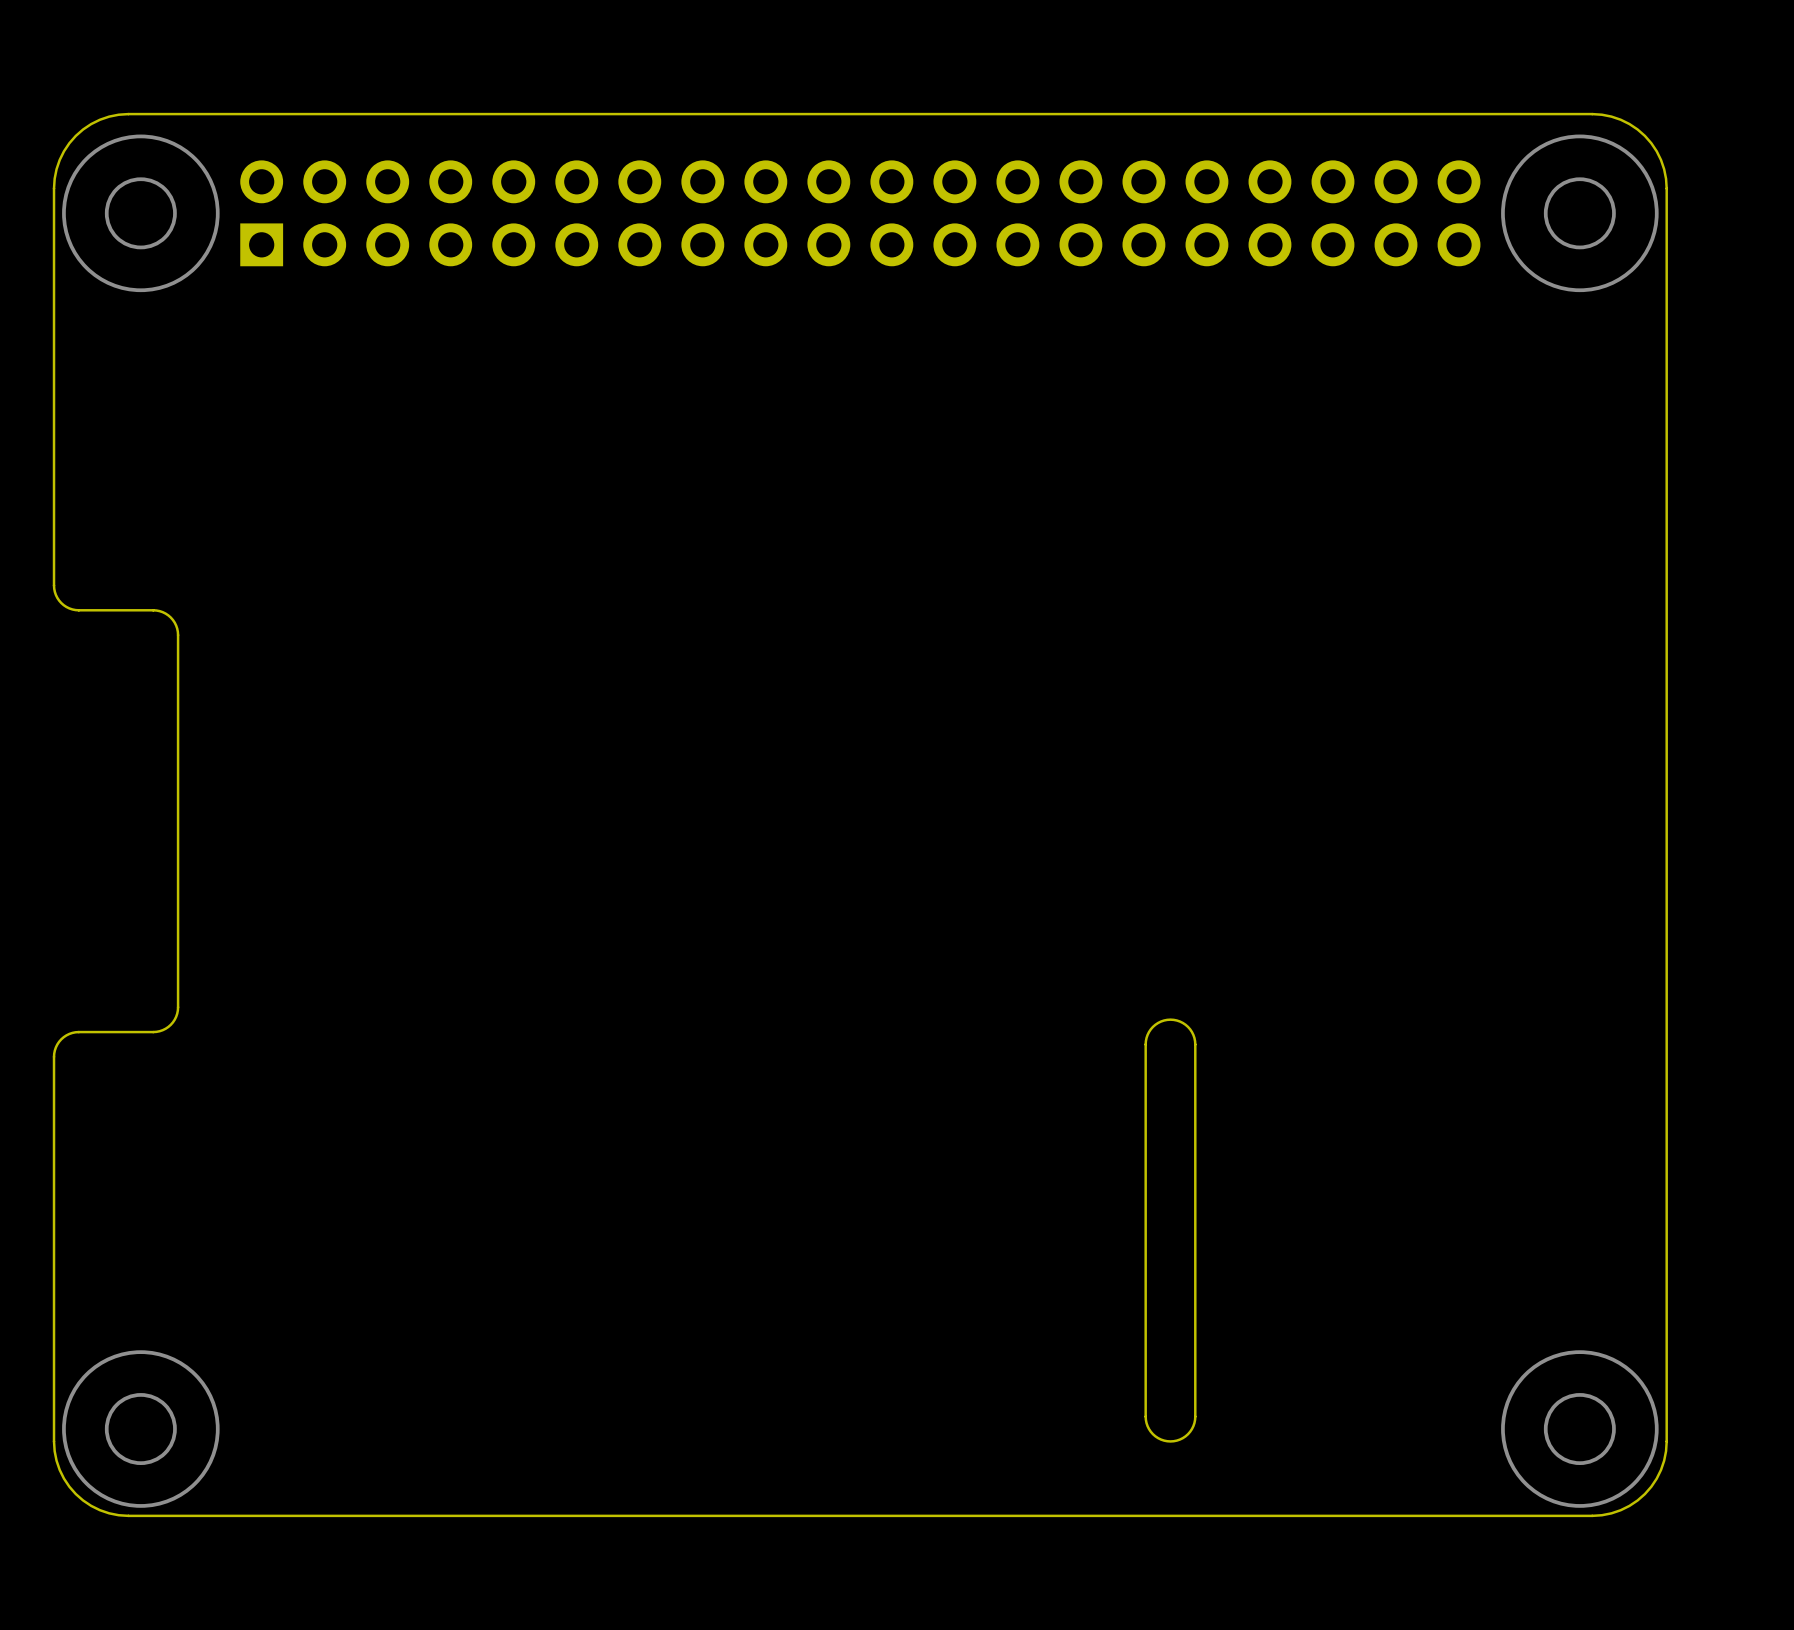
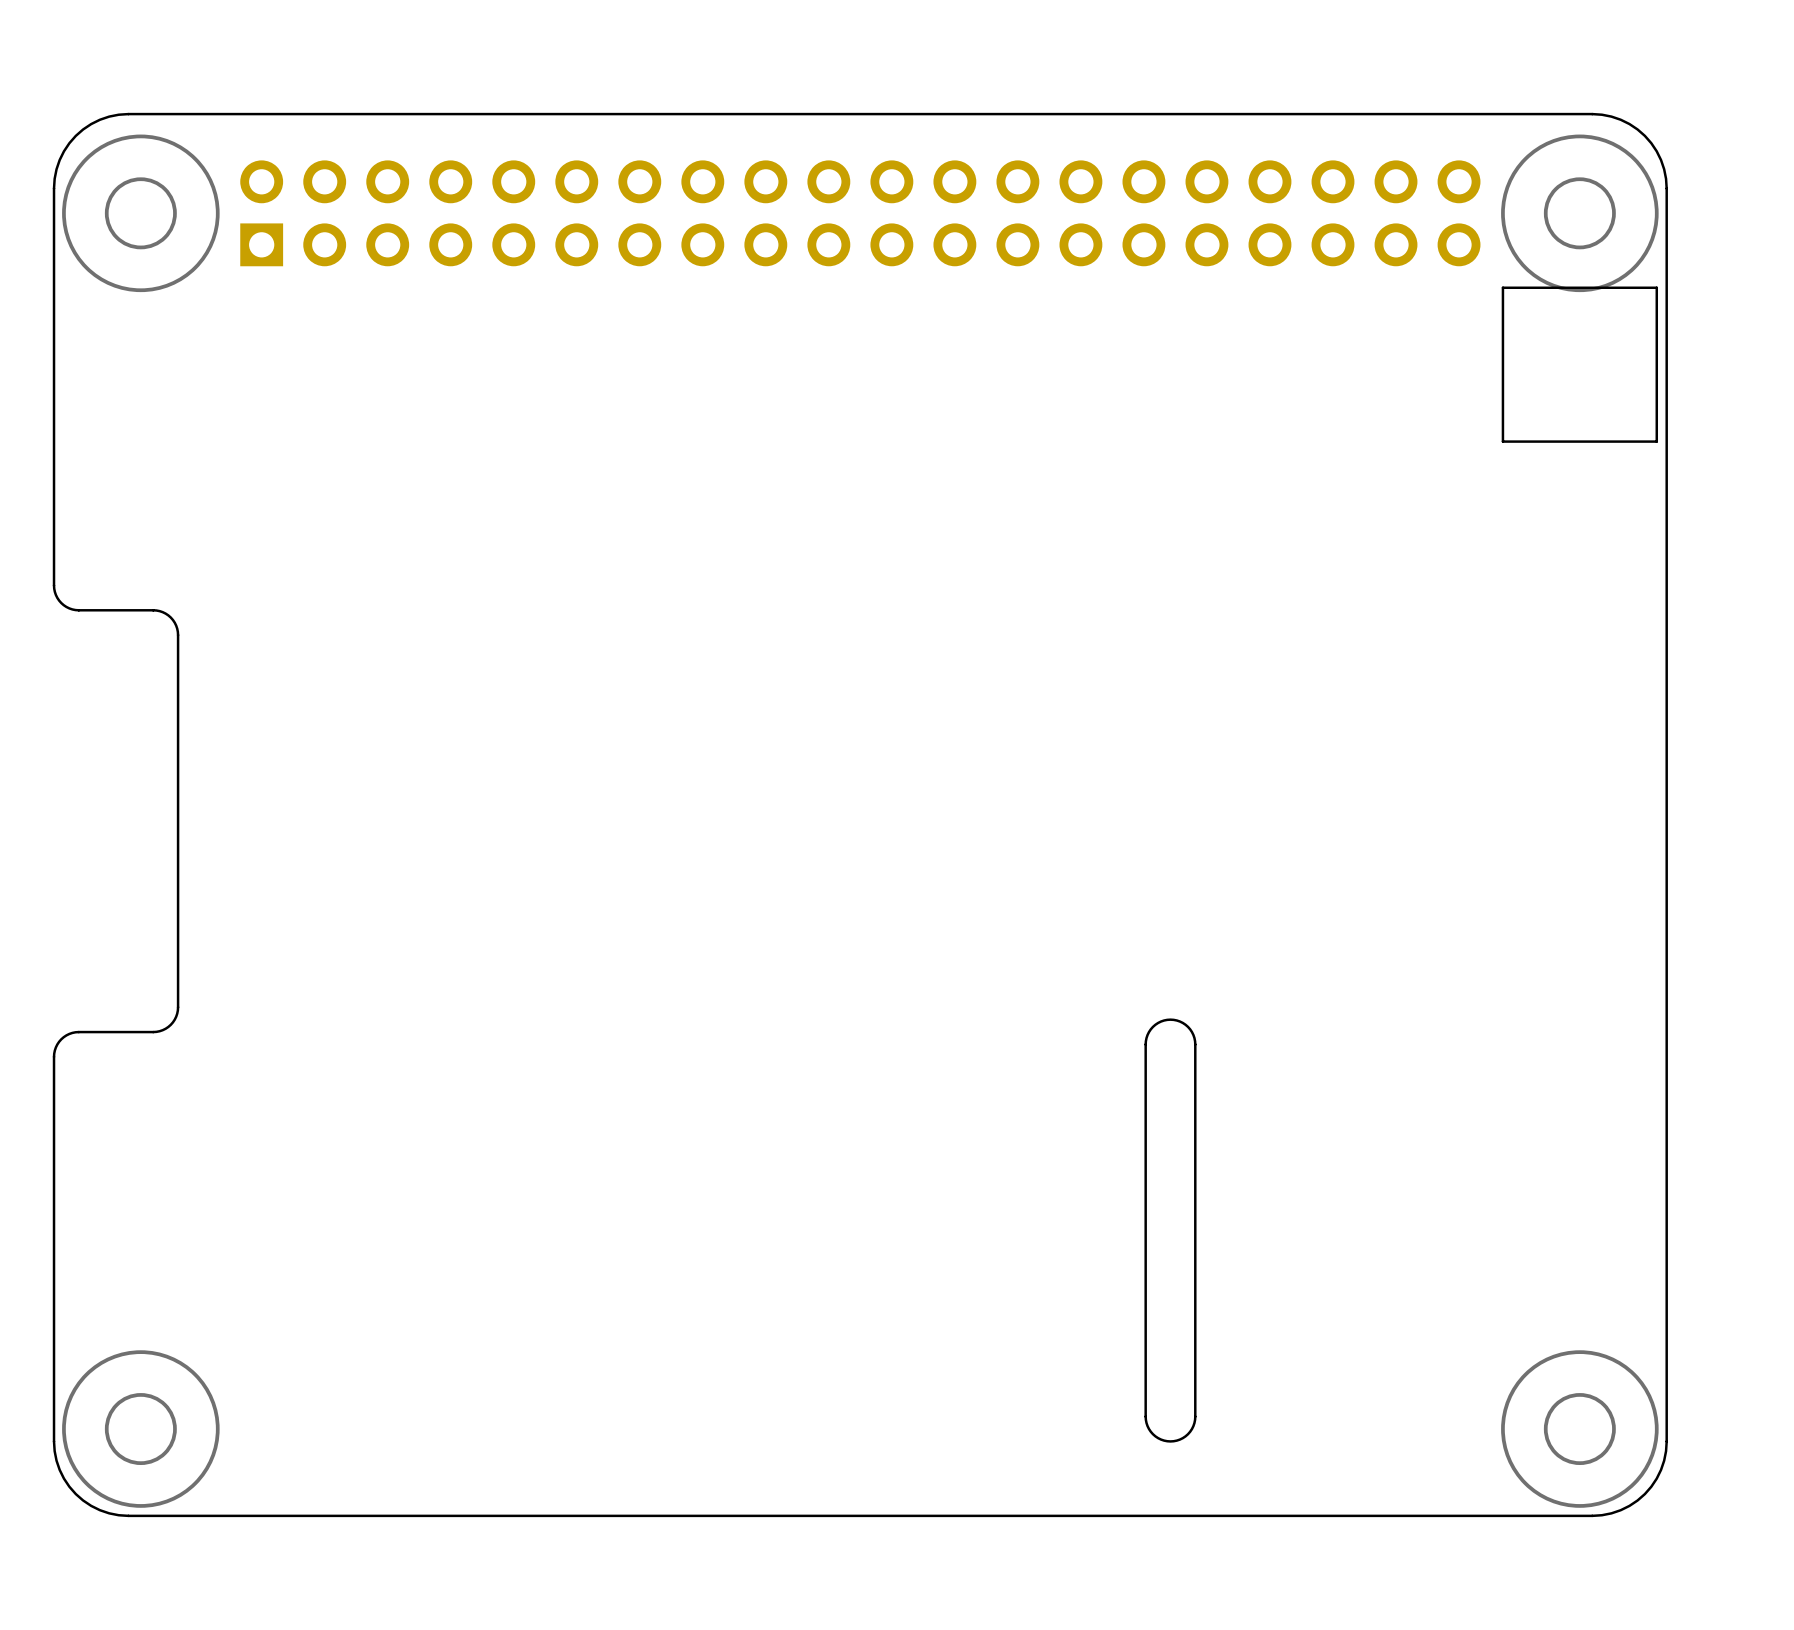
board edge: none -> (1502, 287) (1656, 287) (1656, 441) (1502, 441) (1502, 287)

